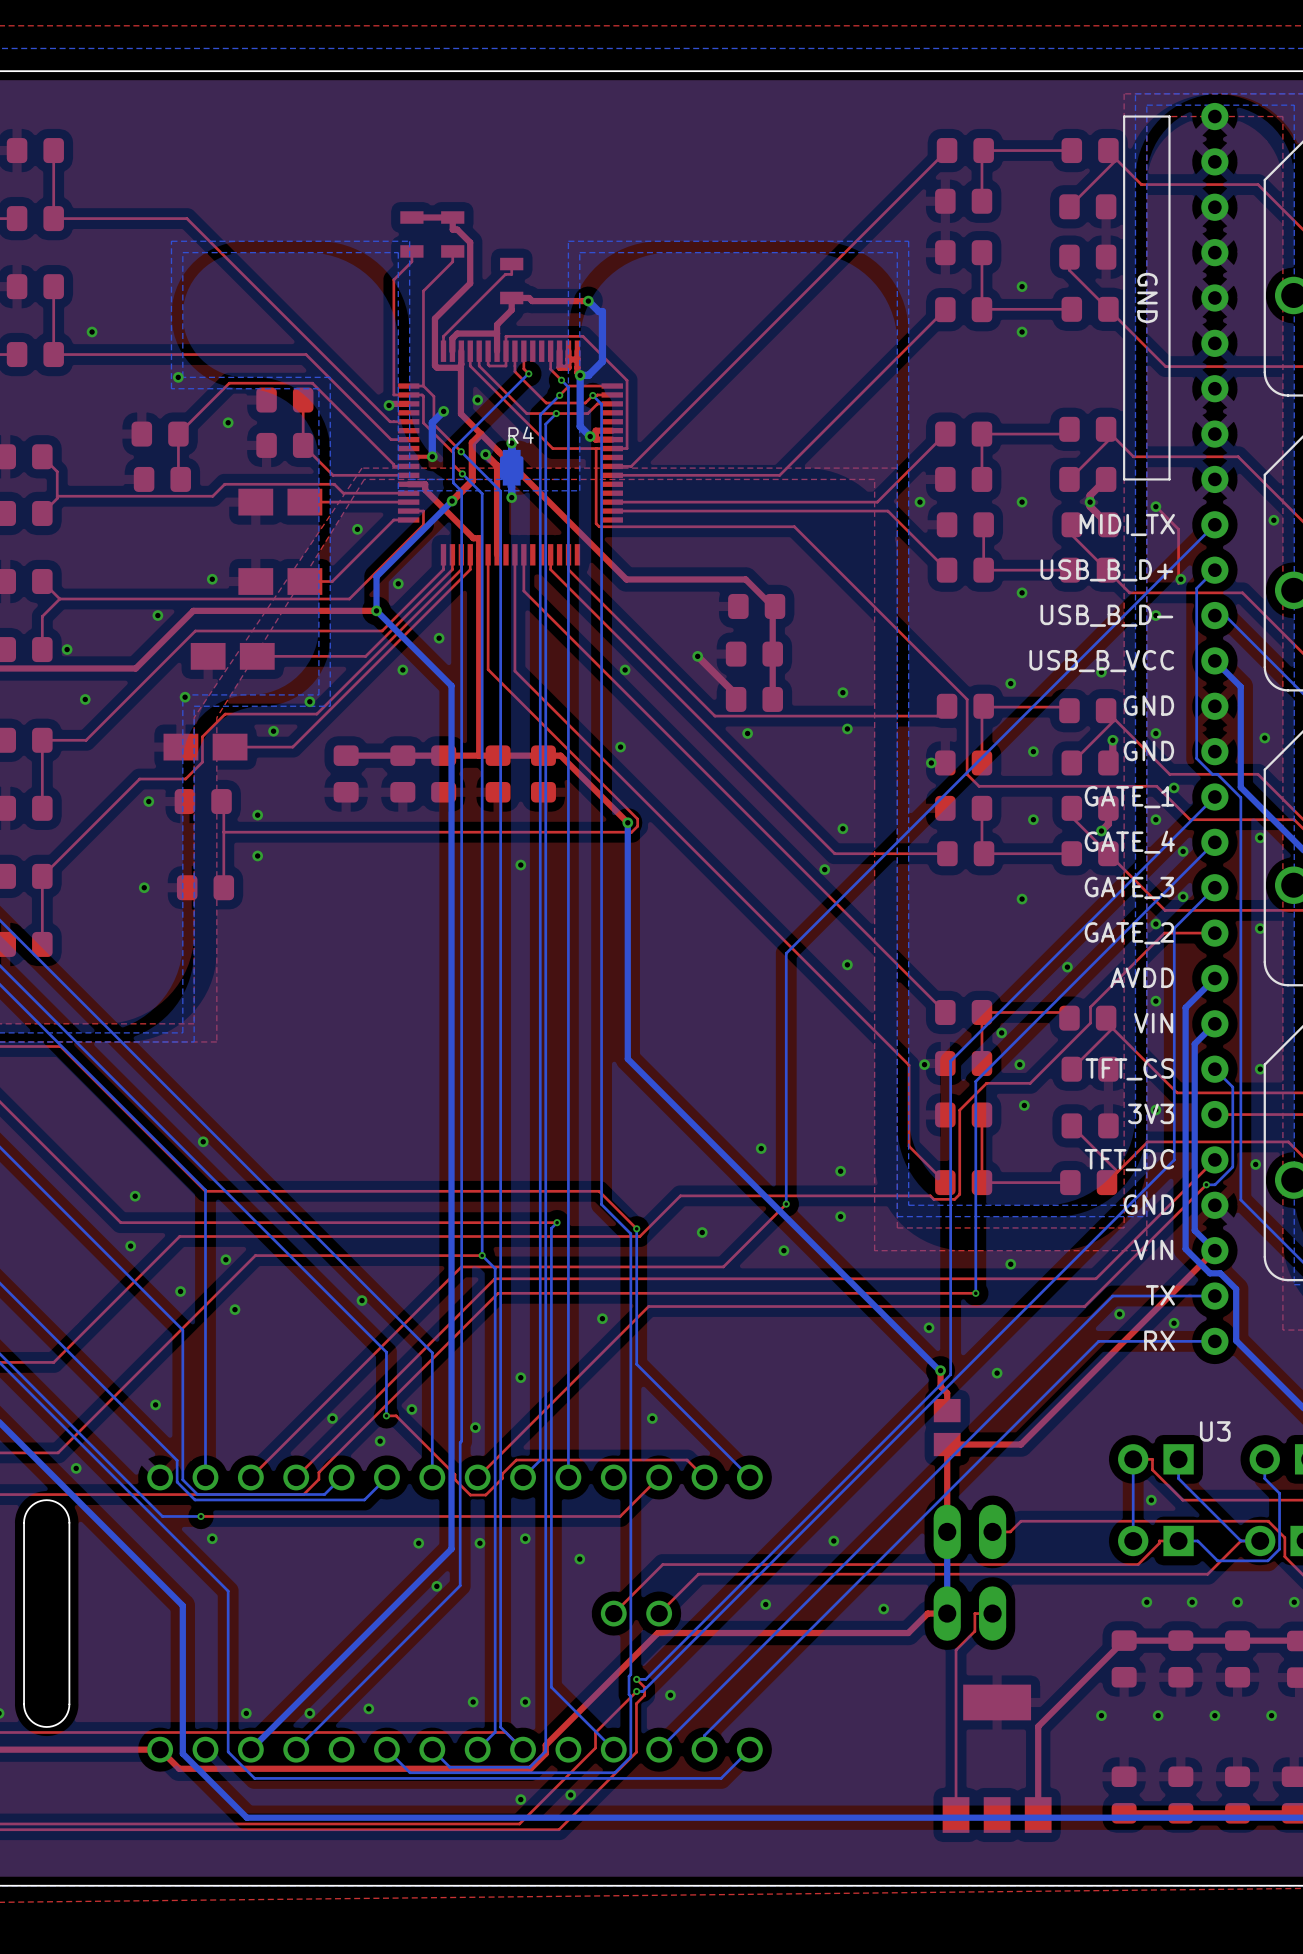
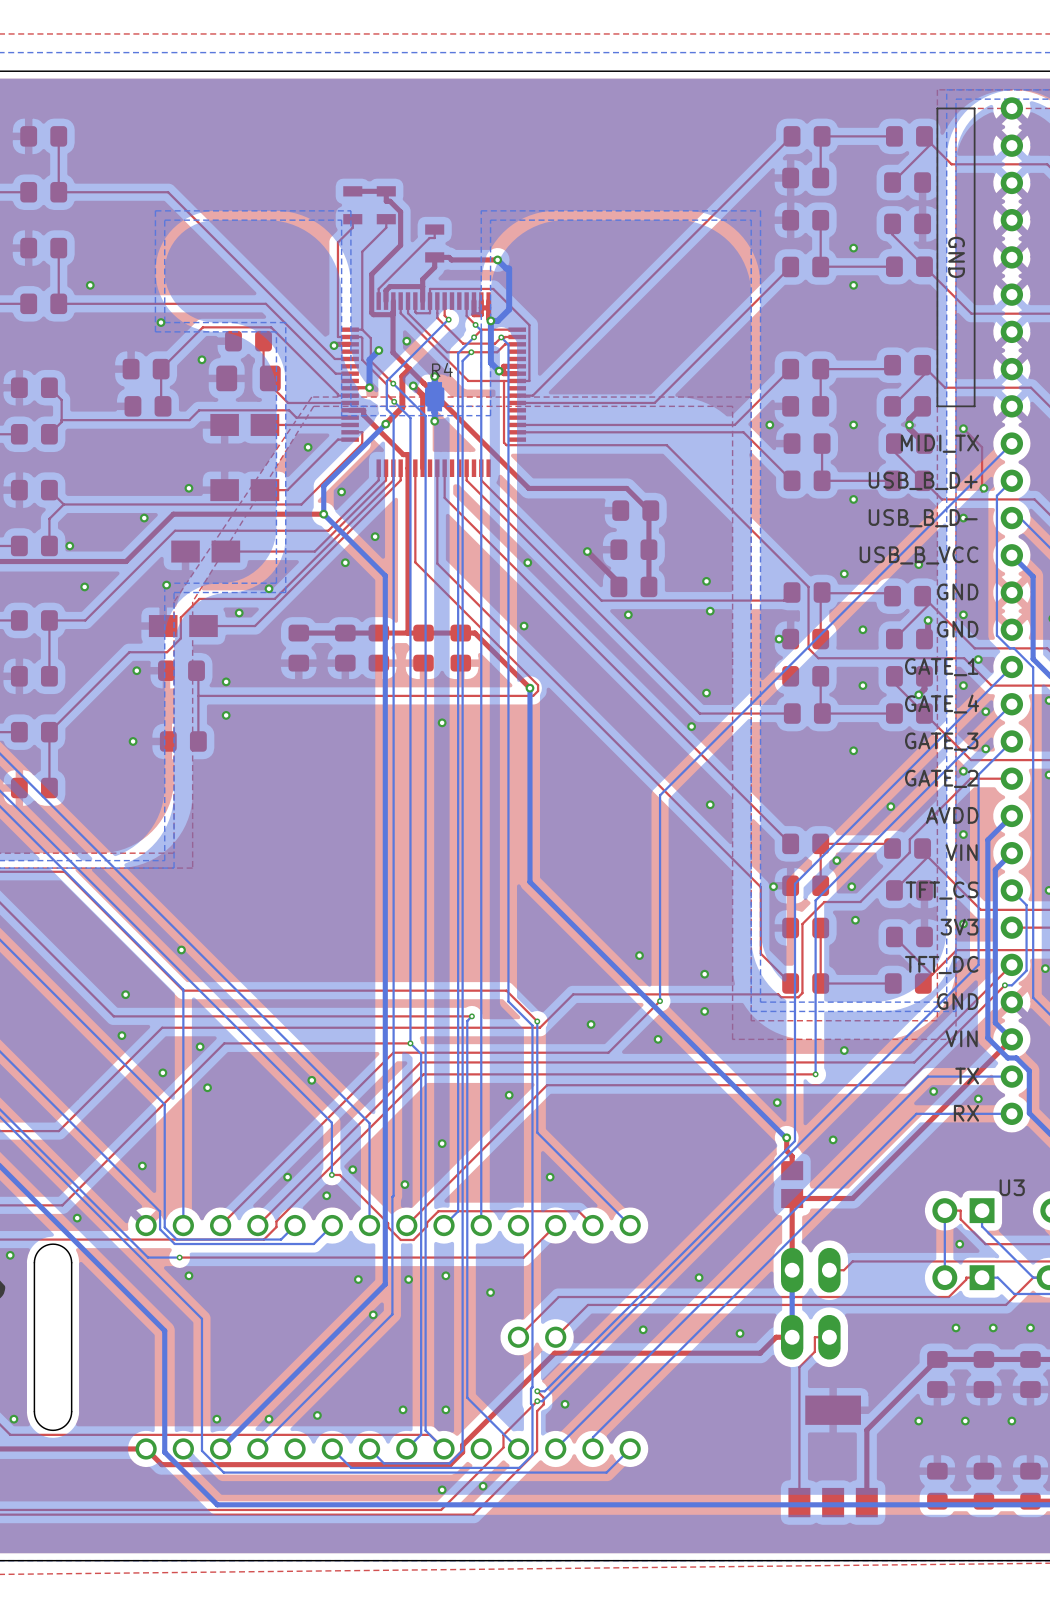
part footprint: [256, 432, 314, 458] -> [216, 365, 281, 392]

